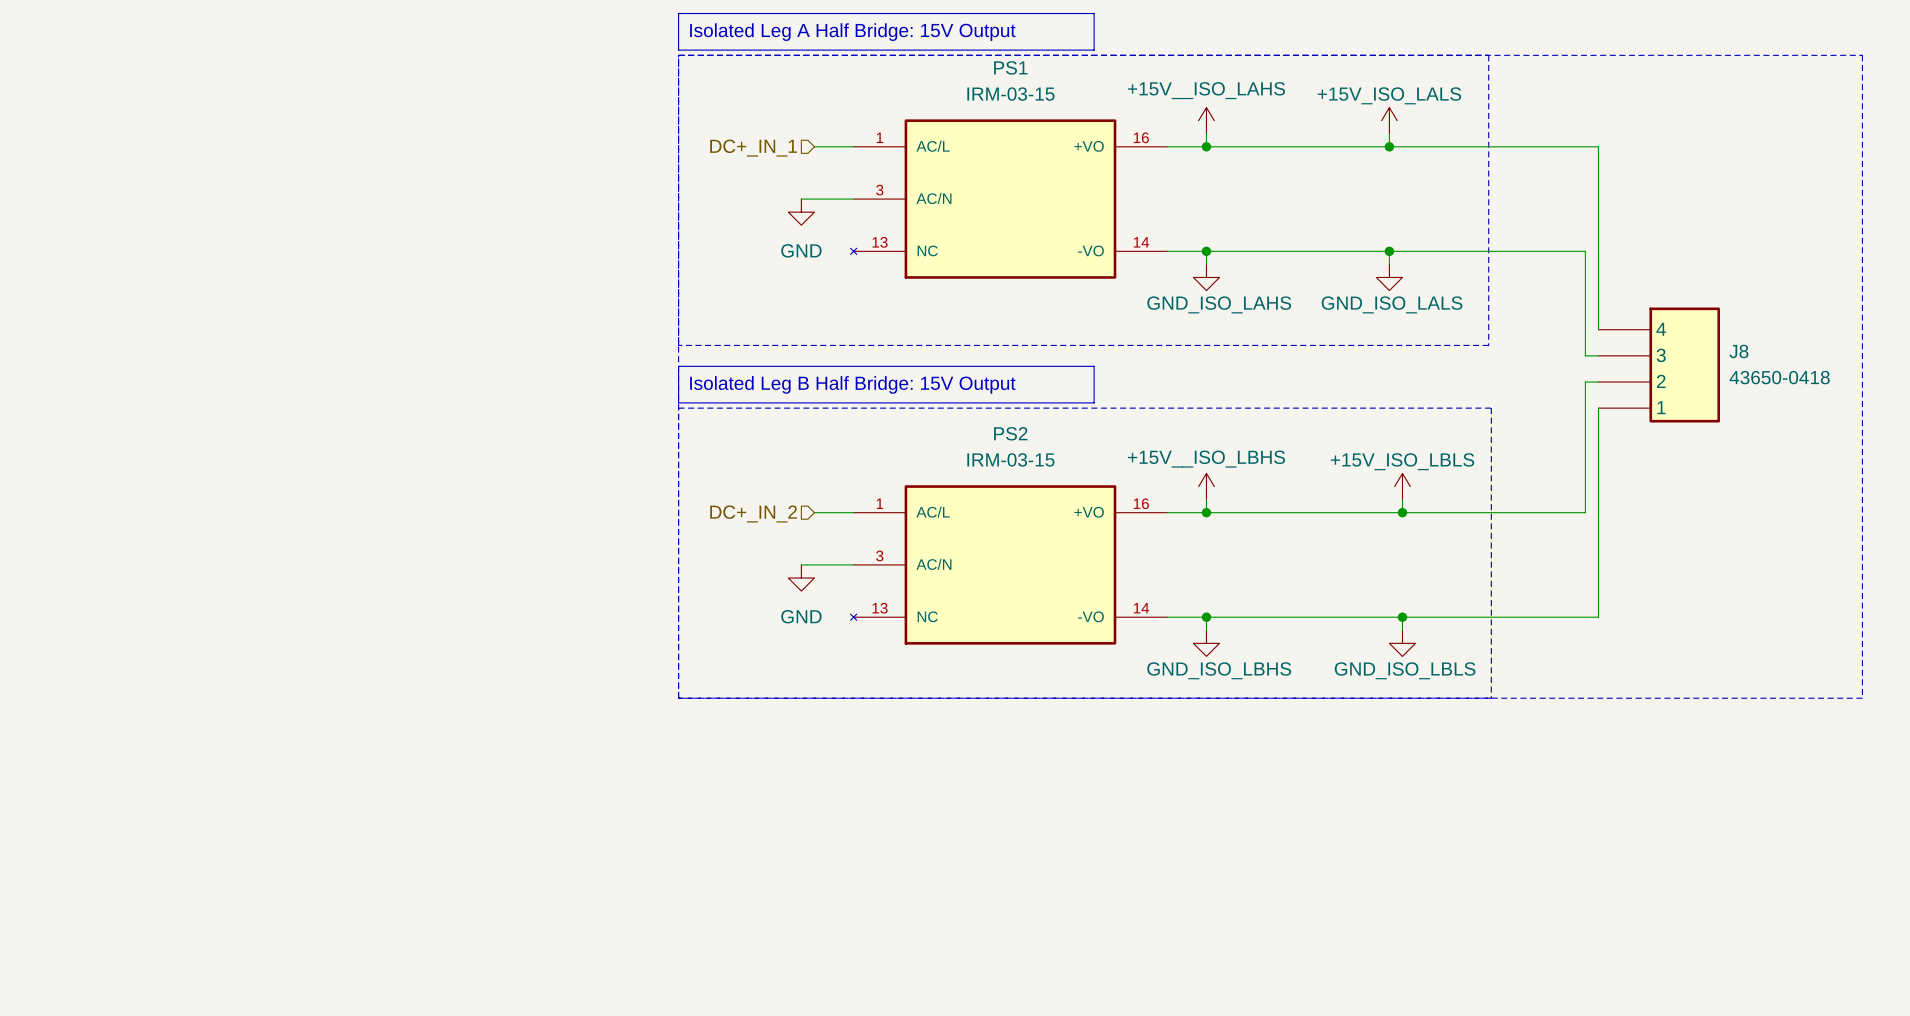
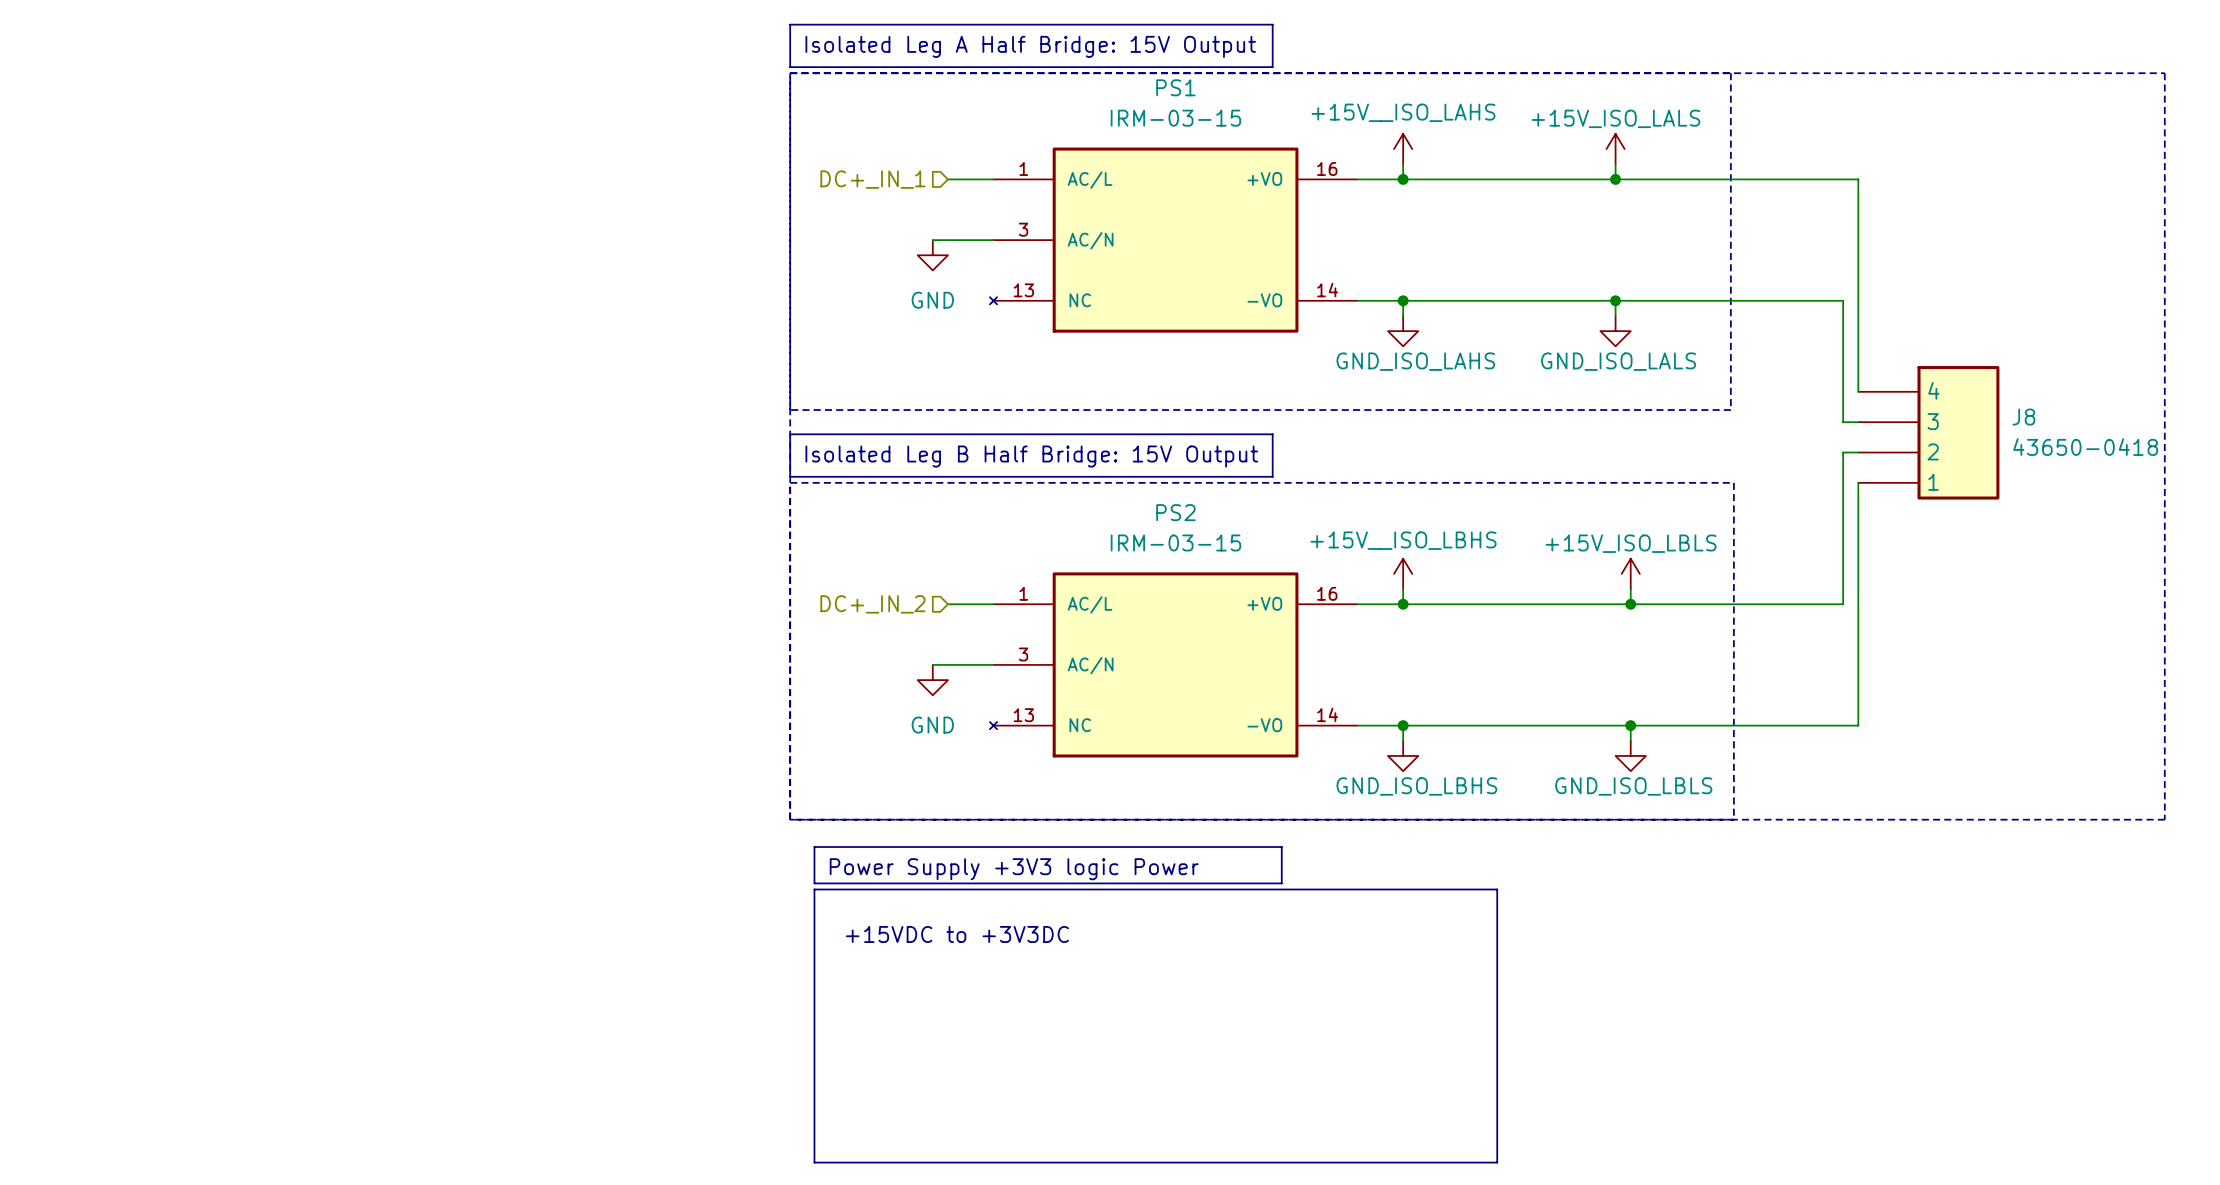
line: none -> (814, 847) (814, 883) (1281, 883) (1281, 847) (814, 847)
text: none -> Power Supply +3V3 logic Power (1014, 869)
line: none -> (814, 889) (1497, 889) (1497, 1162) (814, 1162) (814, 889)
text: none -> +15VDC to +3V3DC (957, 934)

